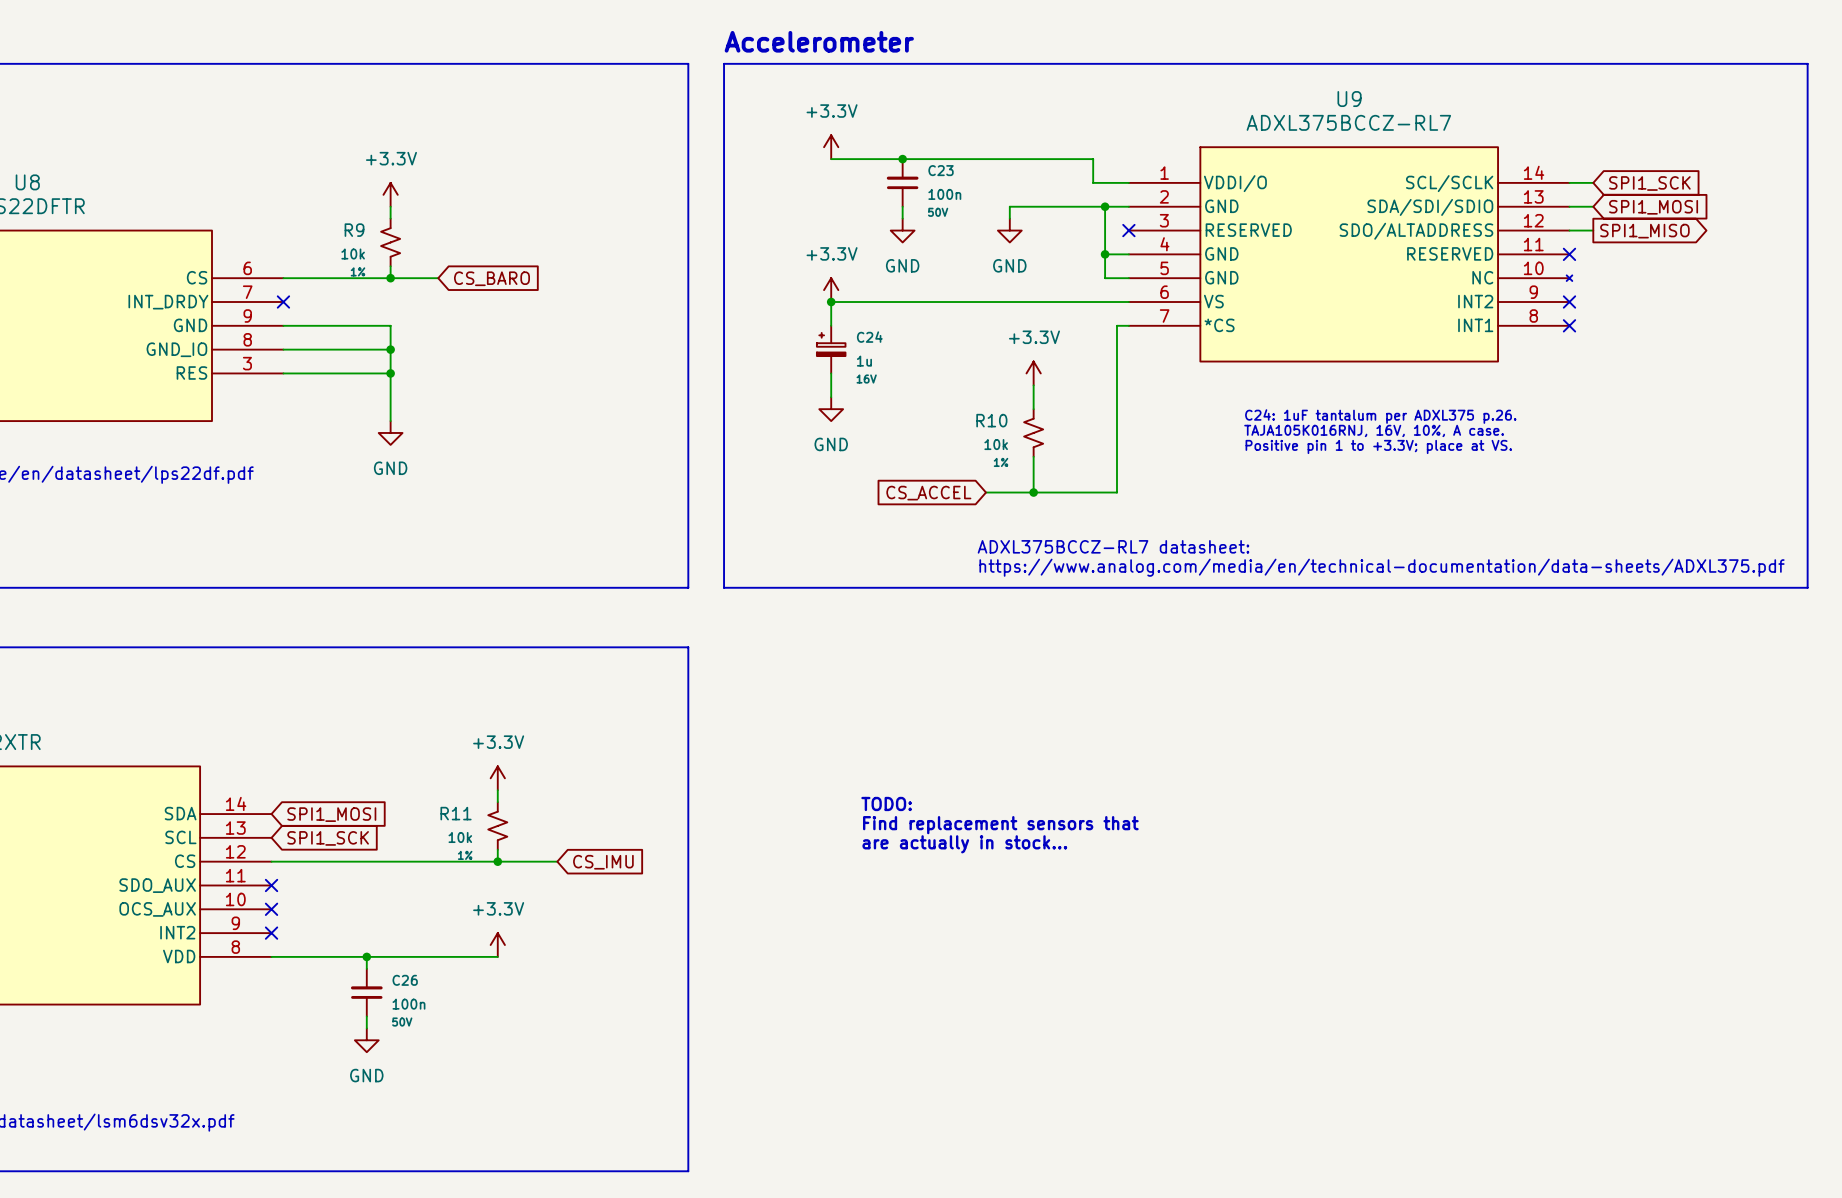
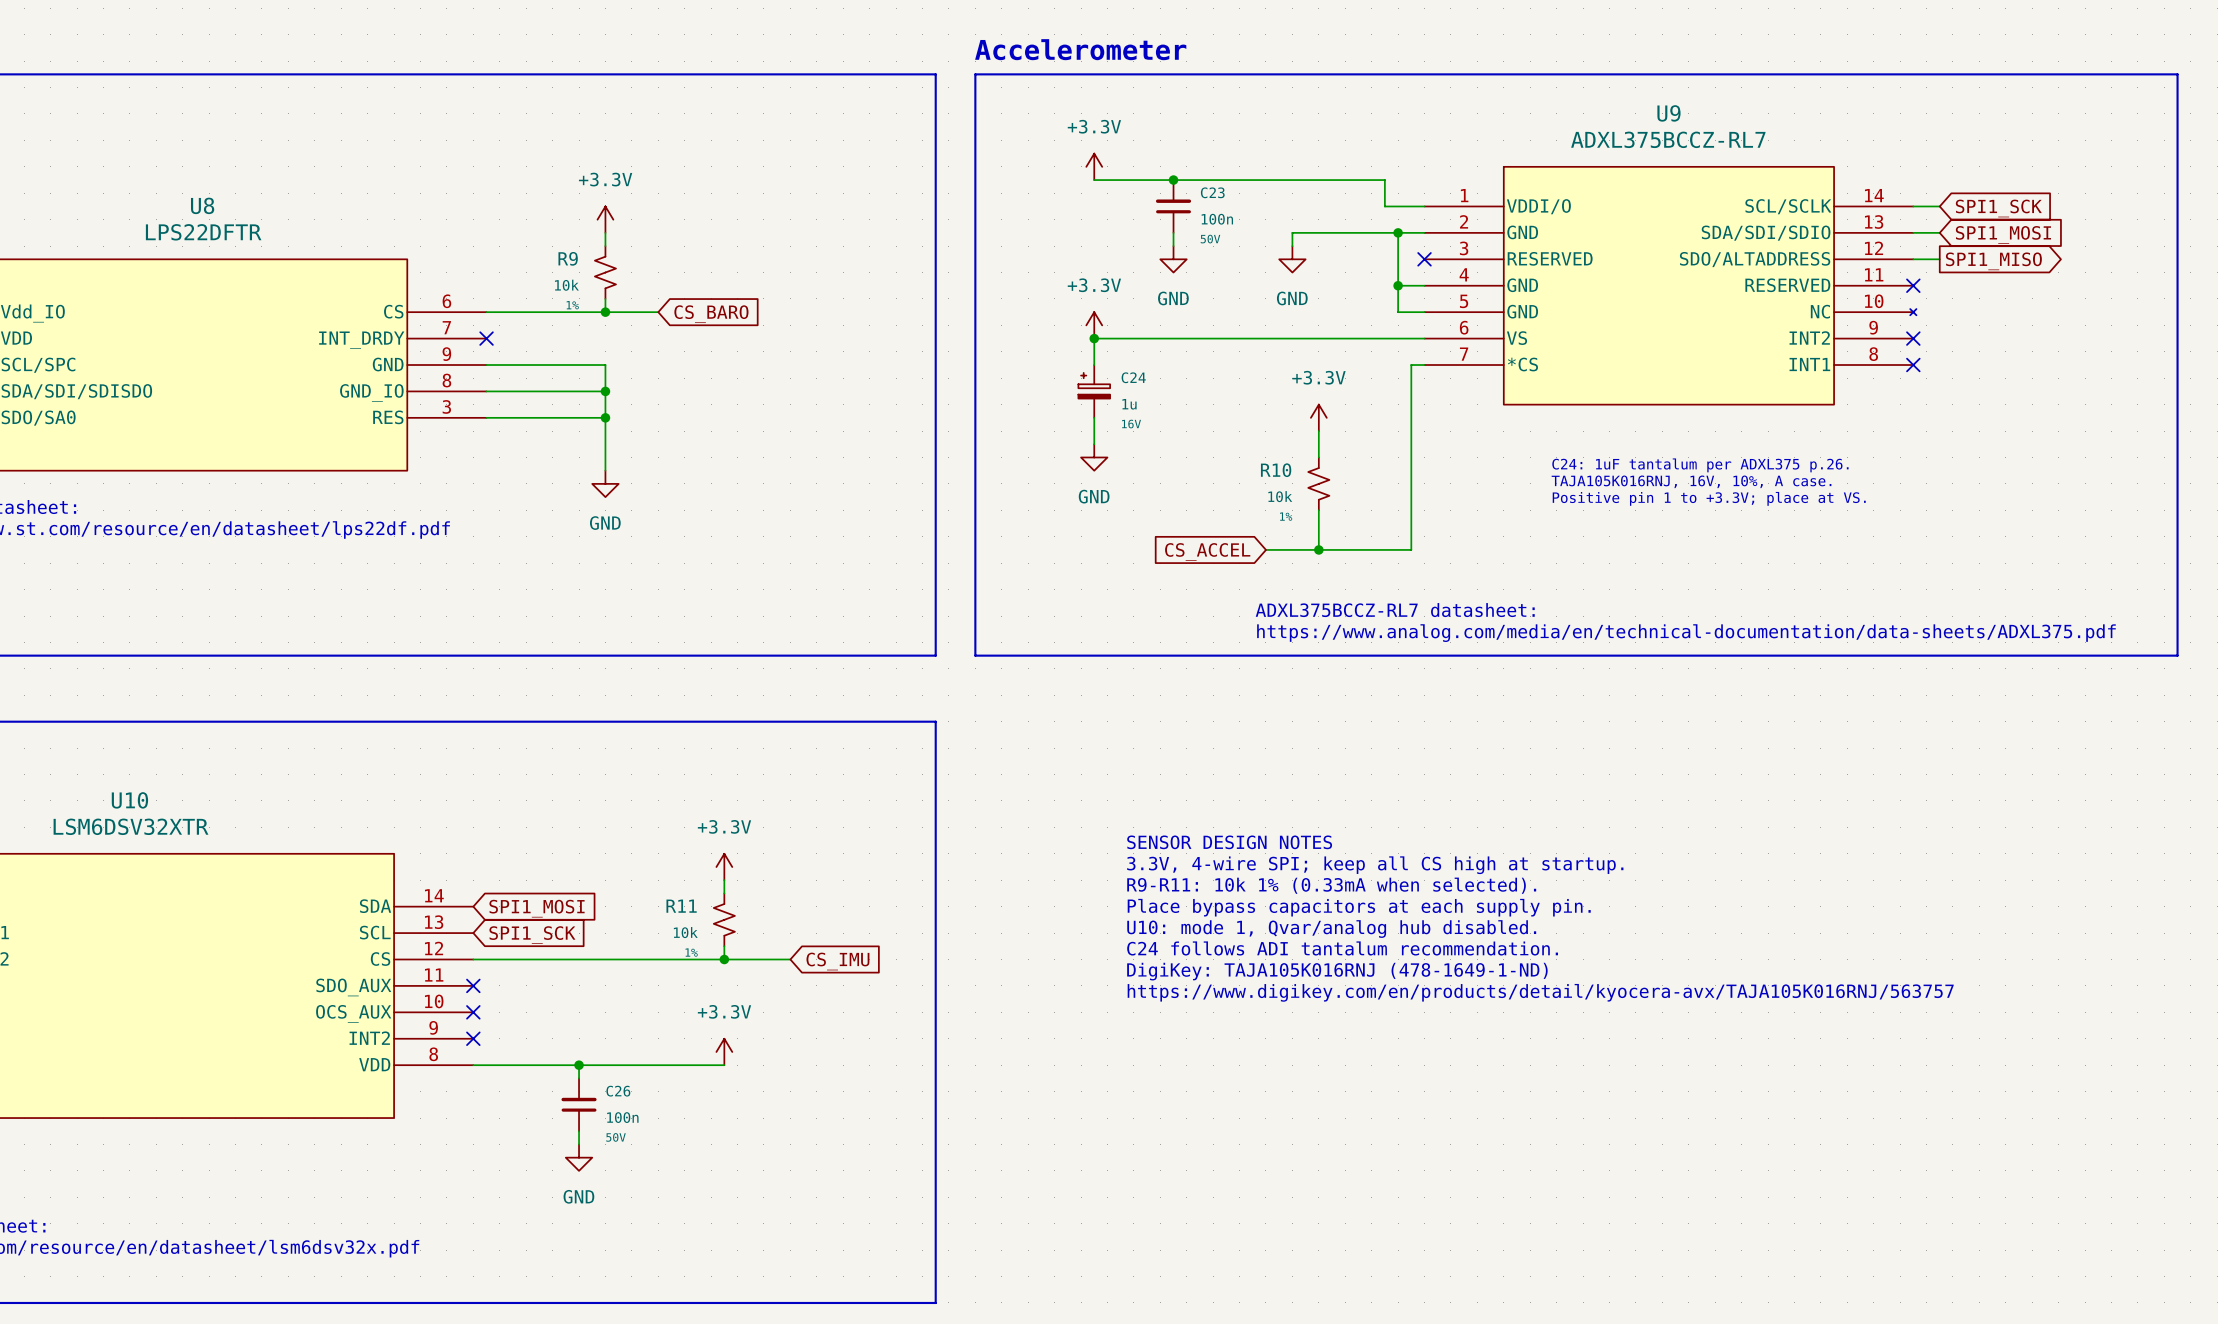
text: none -> SENSOR DESIGN NOTES (1229, 842)
text: none -> 3.3V, 4-wire SPI; keep all CS high at startup. (1375, 865)
text: none -> R9-R11: 10k 1% (0.33mA when selected). (1331, 885)
text: TODO: (886, 803) -> none
text: none -> Place bypass capacitors at each supply pin. (1359, 907)
text: Find replacement sensors that (1000, 825) -> none
text: none -> U10: mode 1, Qvar/analog hub disabled. (1331, 929)
text: are actually in stock... (964, 844) -> none
text: none -> C24 follows ADI tantalum recommendation. (1342, 948)
text: none -> DigiKey: TAJA105K016RNJ (478-1649-1-ND) (1337, 971)
text: none -> https://www.digikey.com/en/products/detail/kyocera-avx/TAJA105K016RNJ/563757 (1540, 992)

